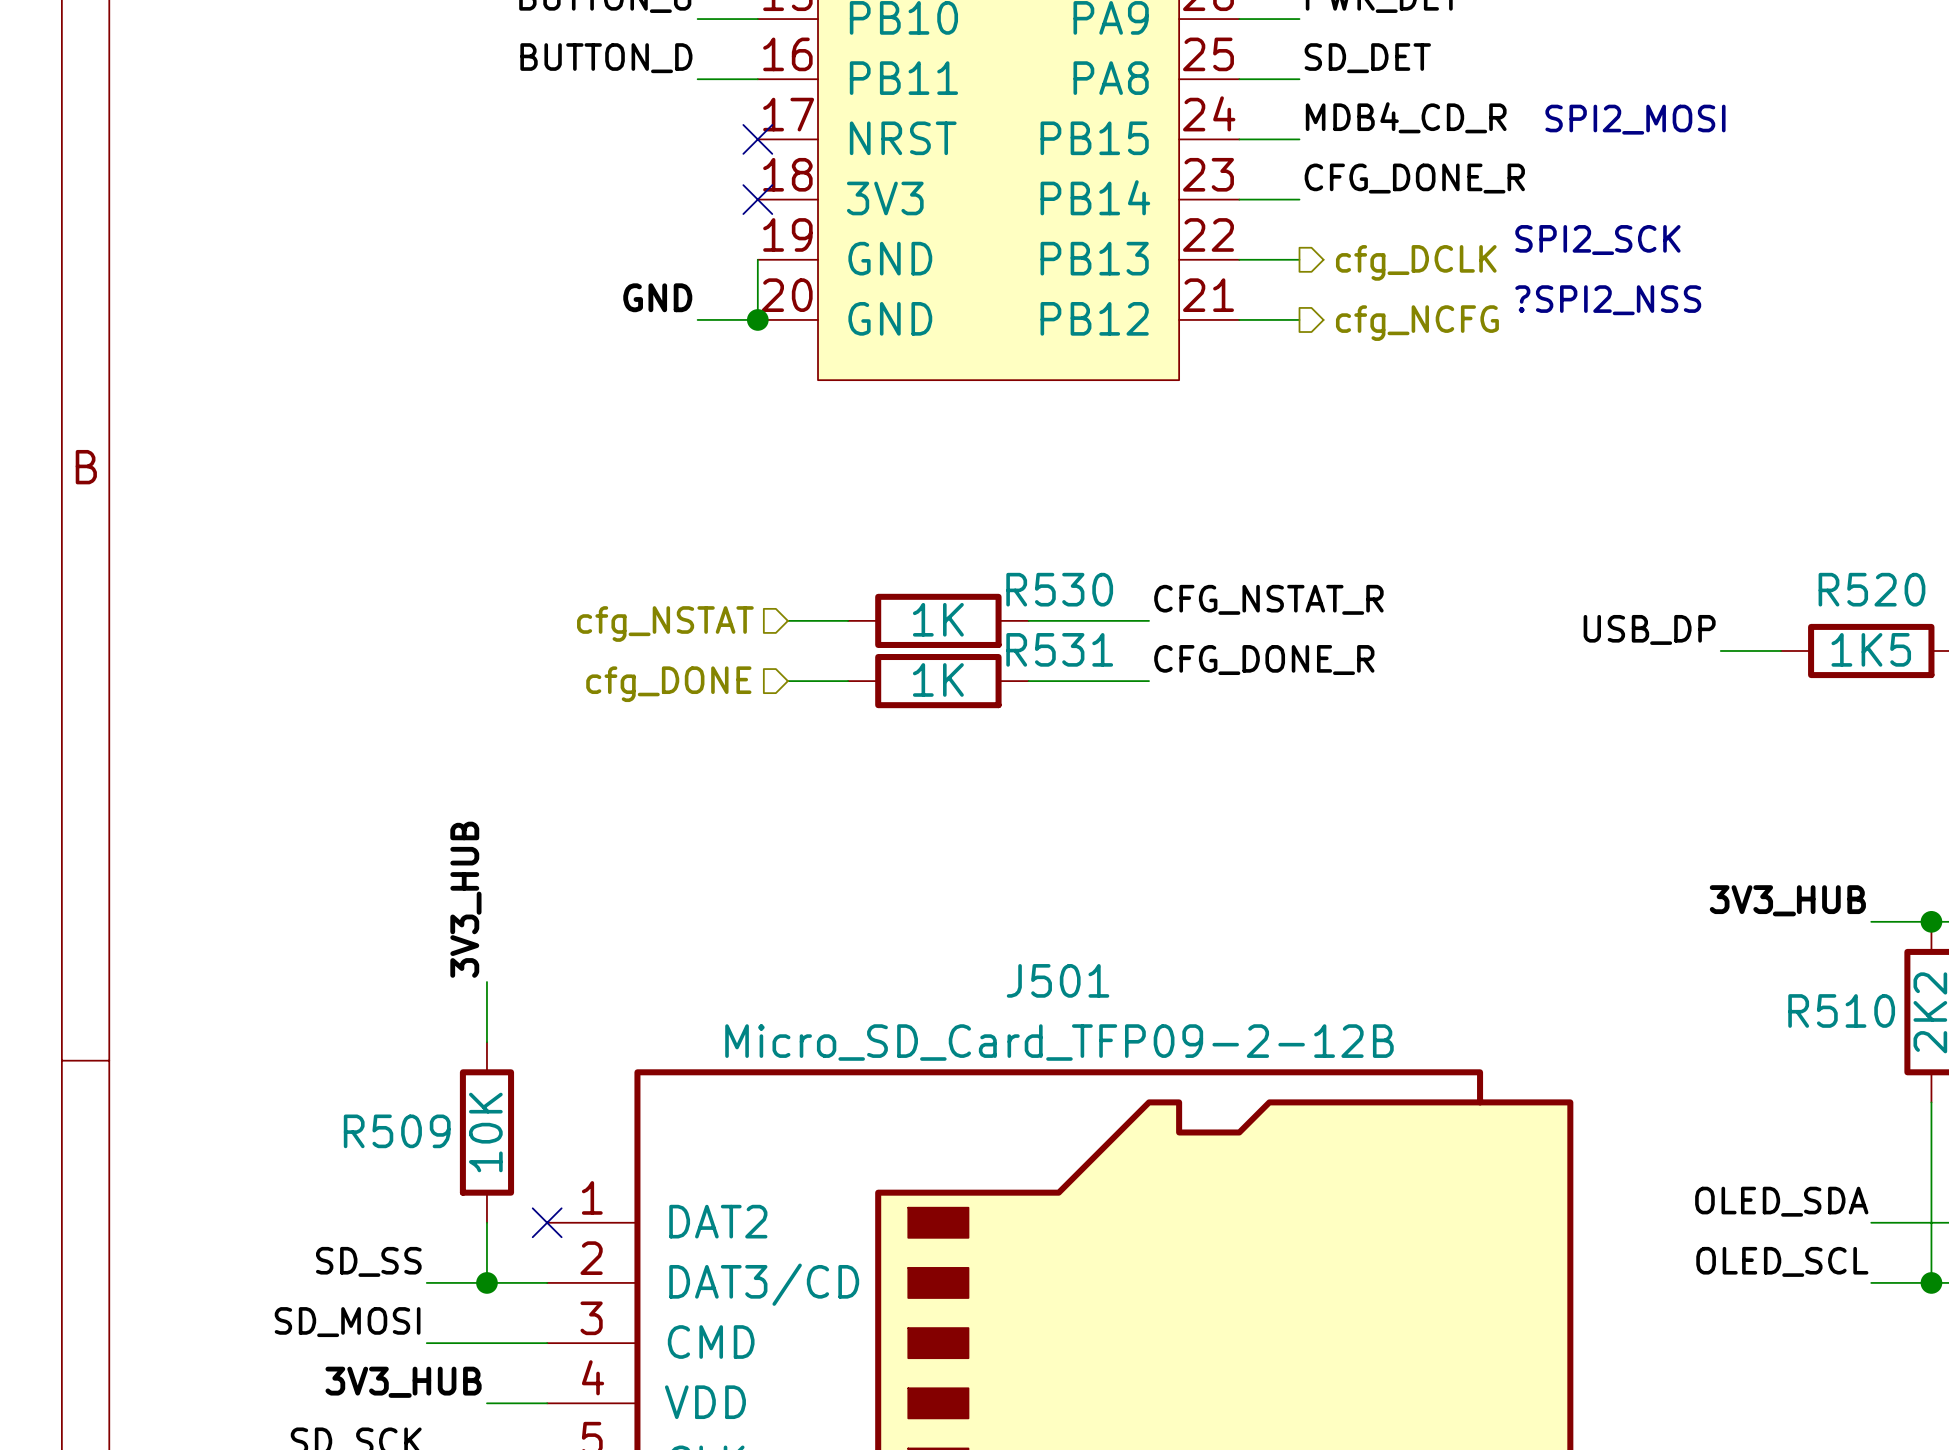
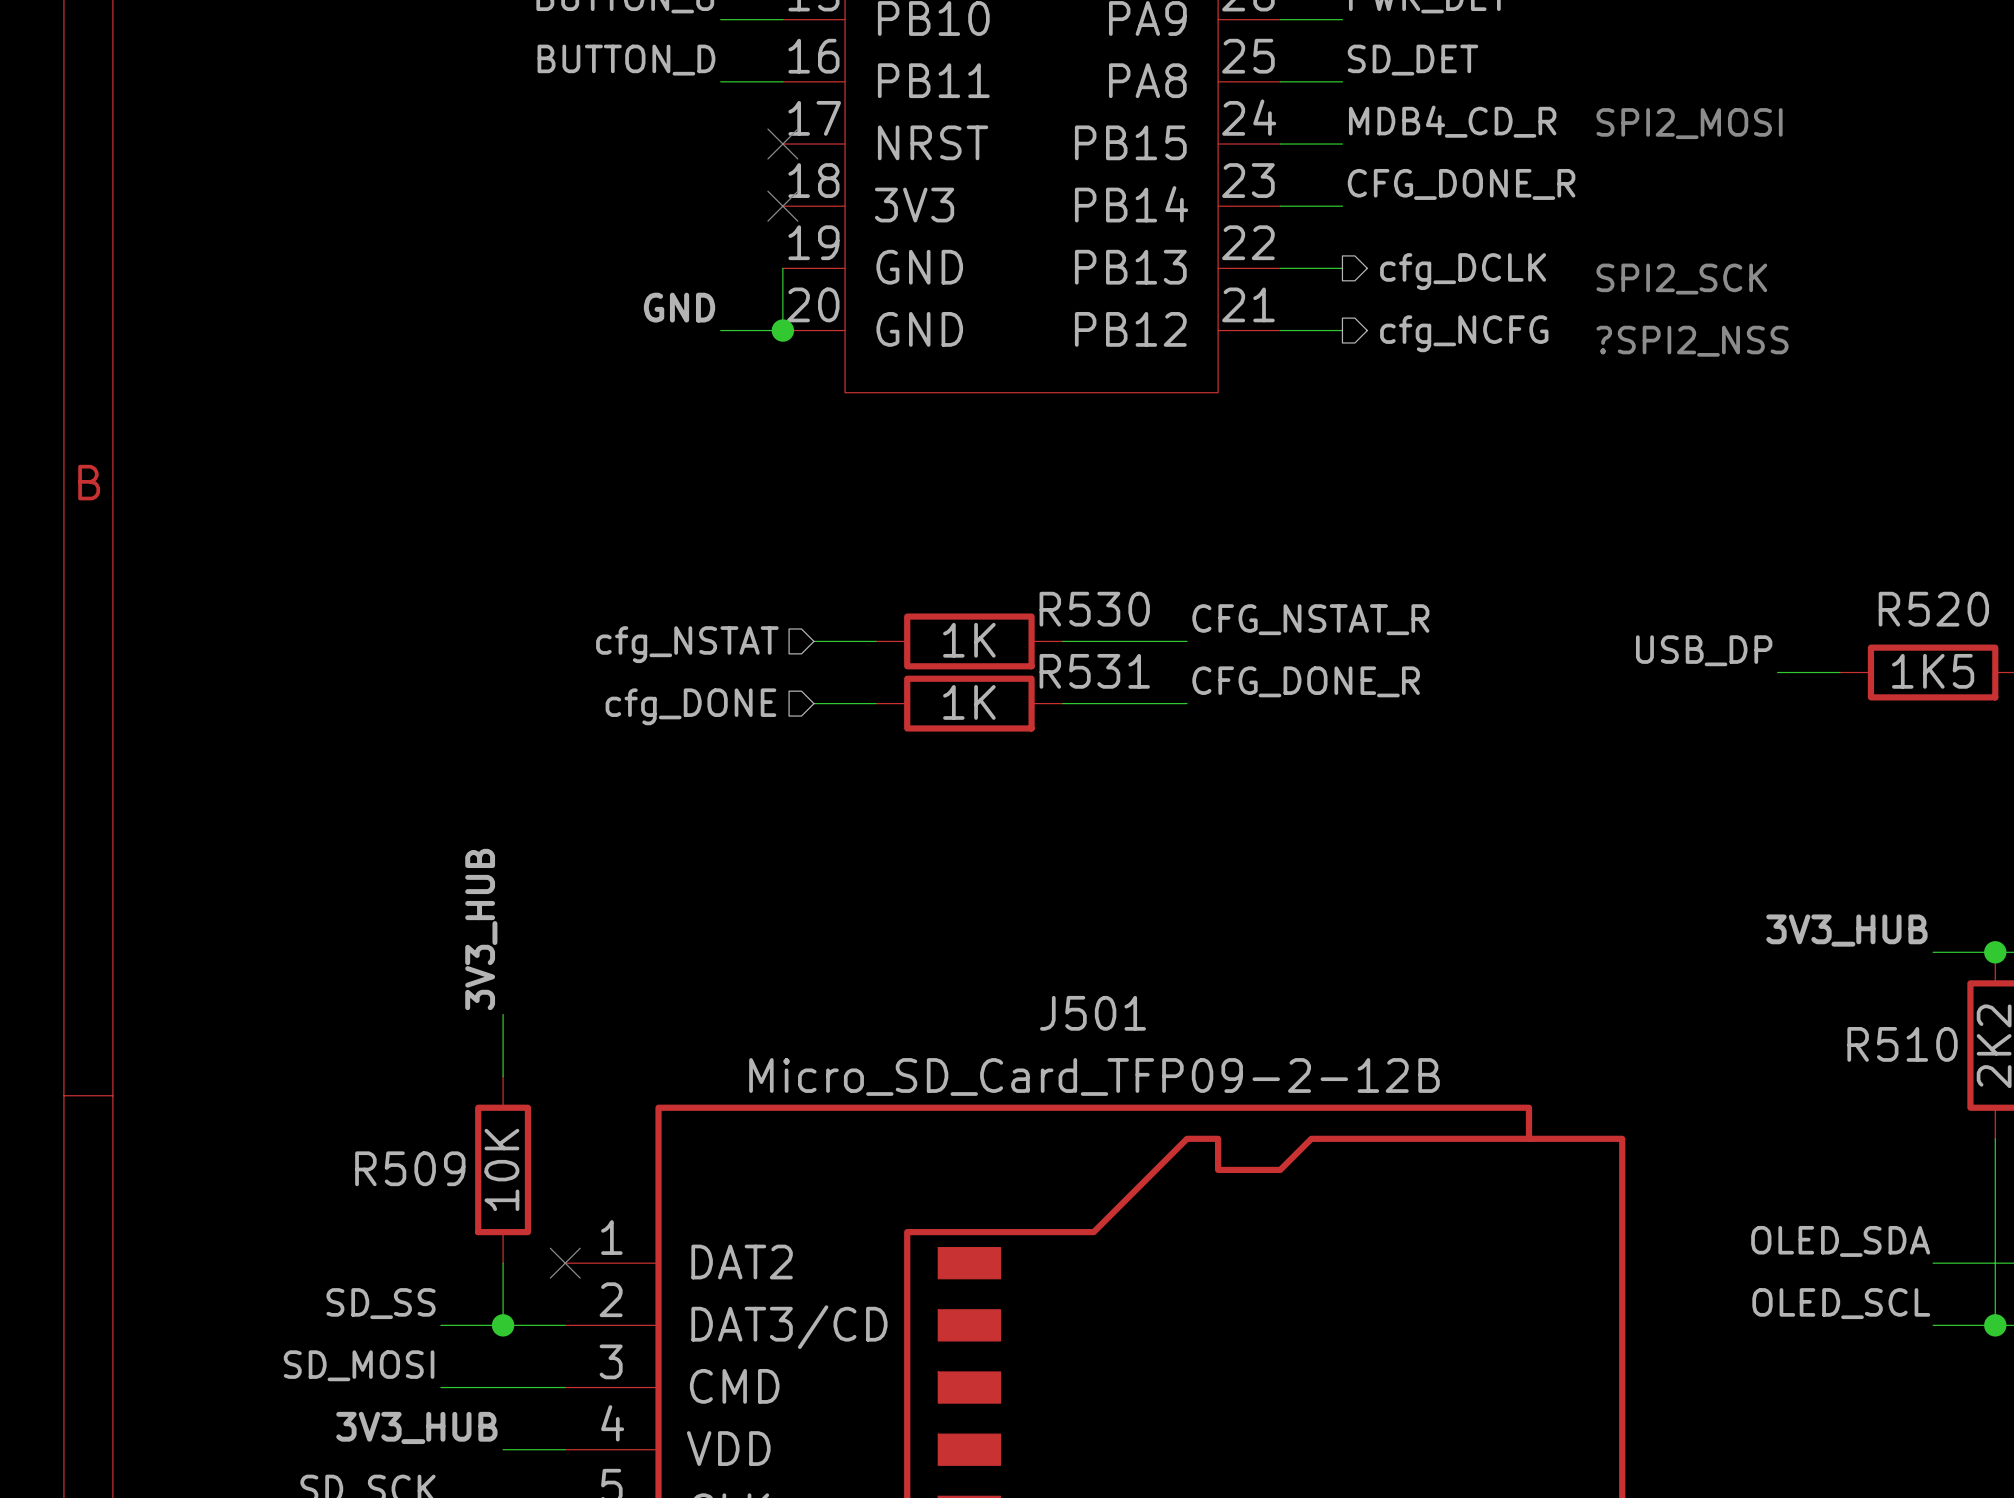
text position: SPI2_SCK (1597, 240) -> SPI2_SCK (1681, 279)
text position: ?SPI2_NSS (1608, 300) -> ?SPI2_NSS (1692, 341)

